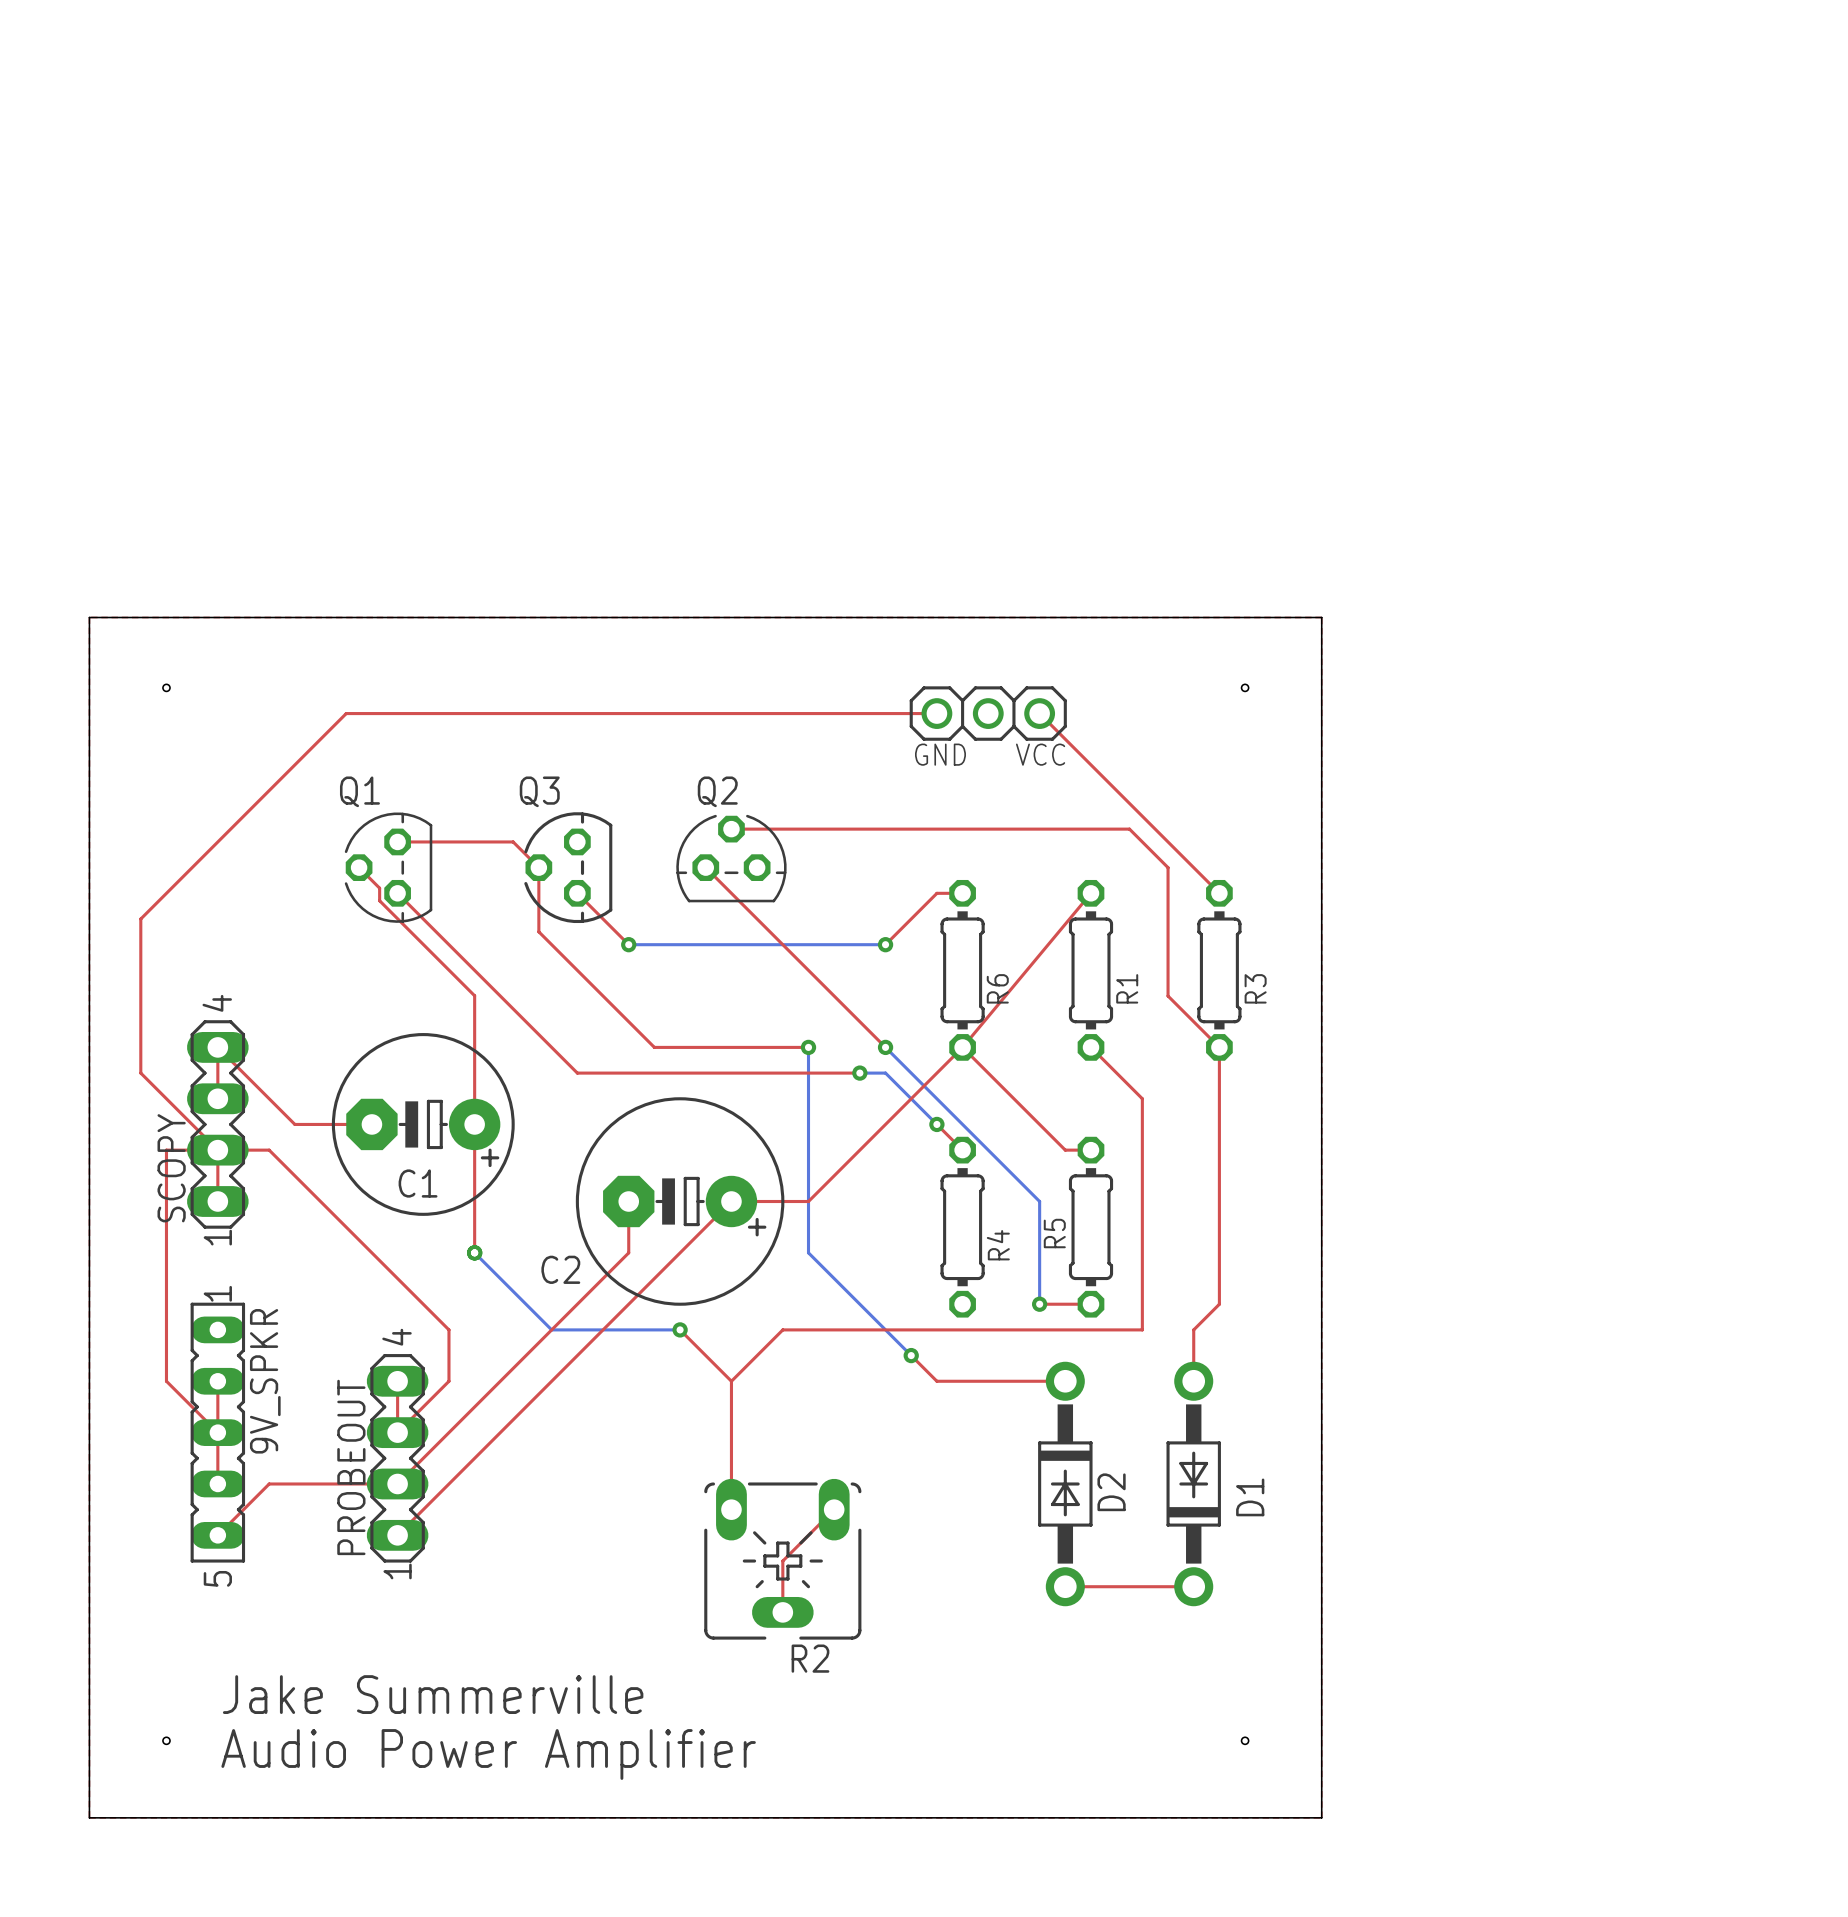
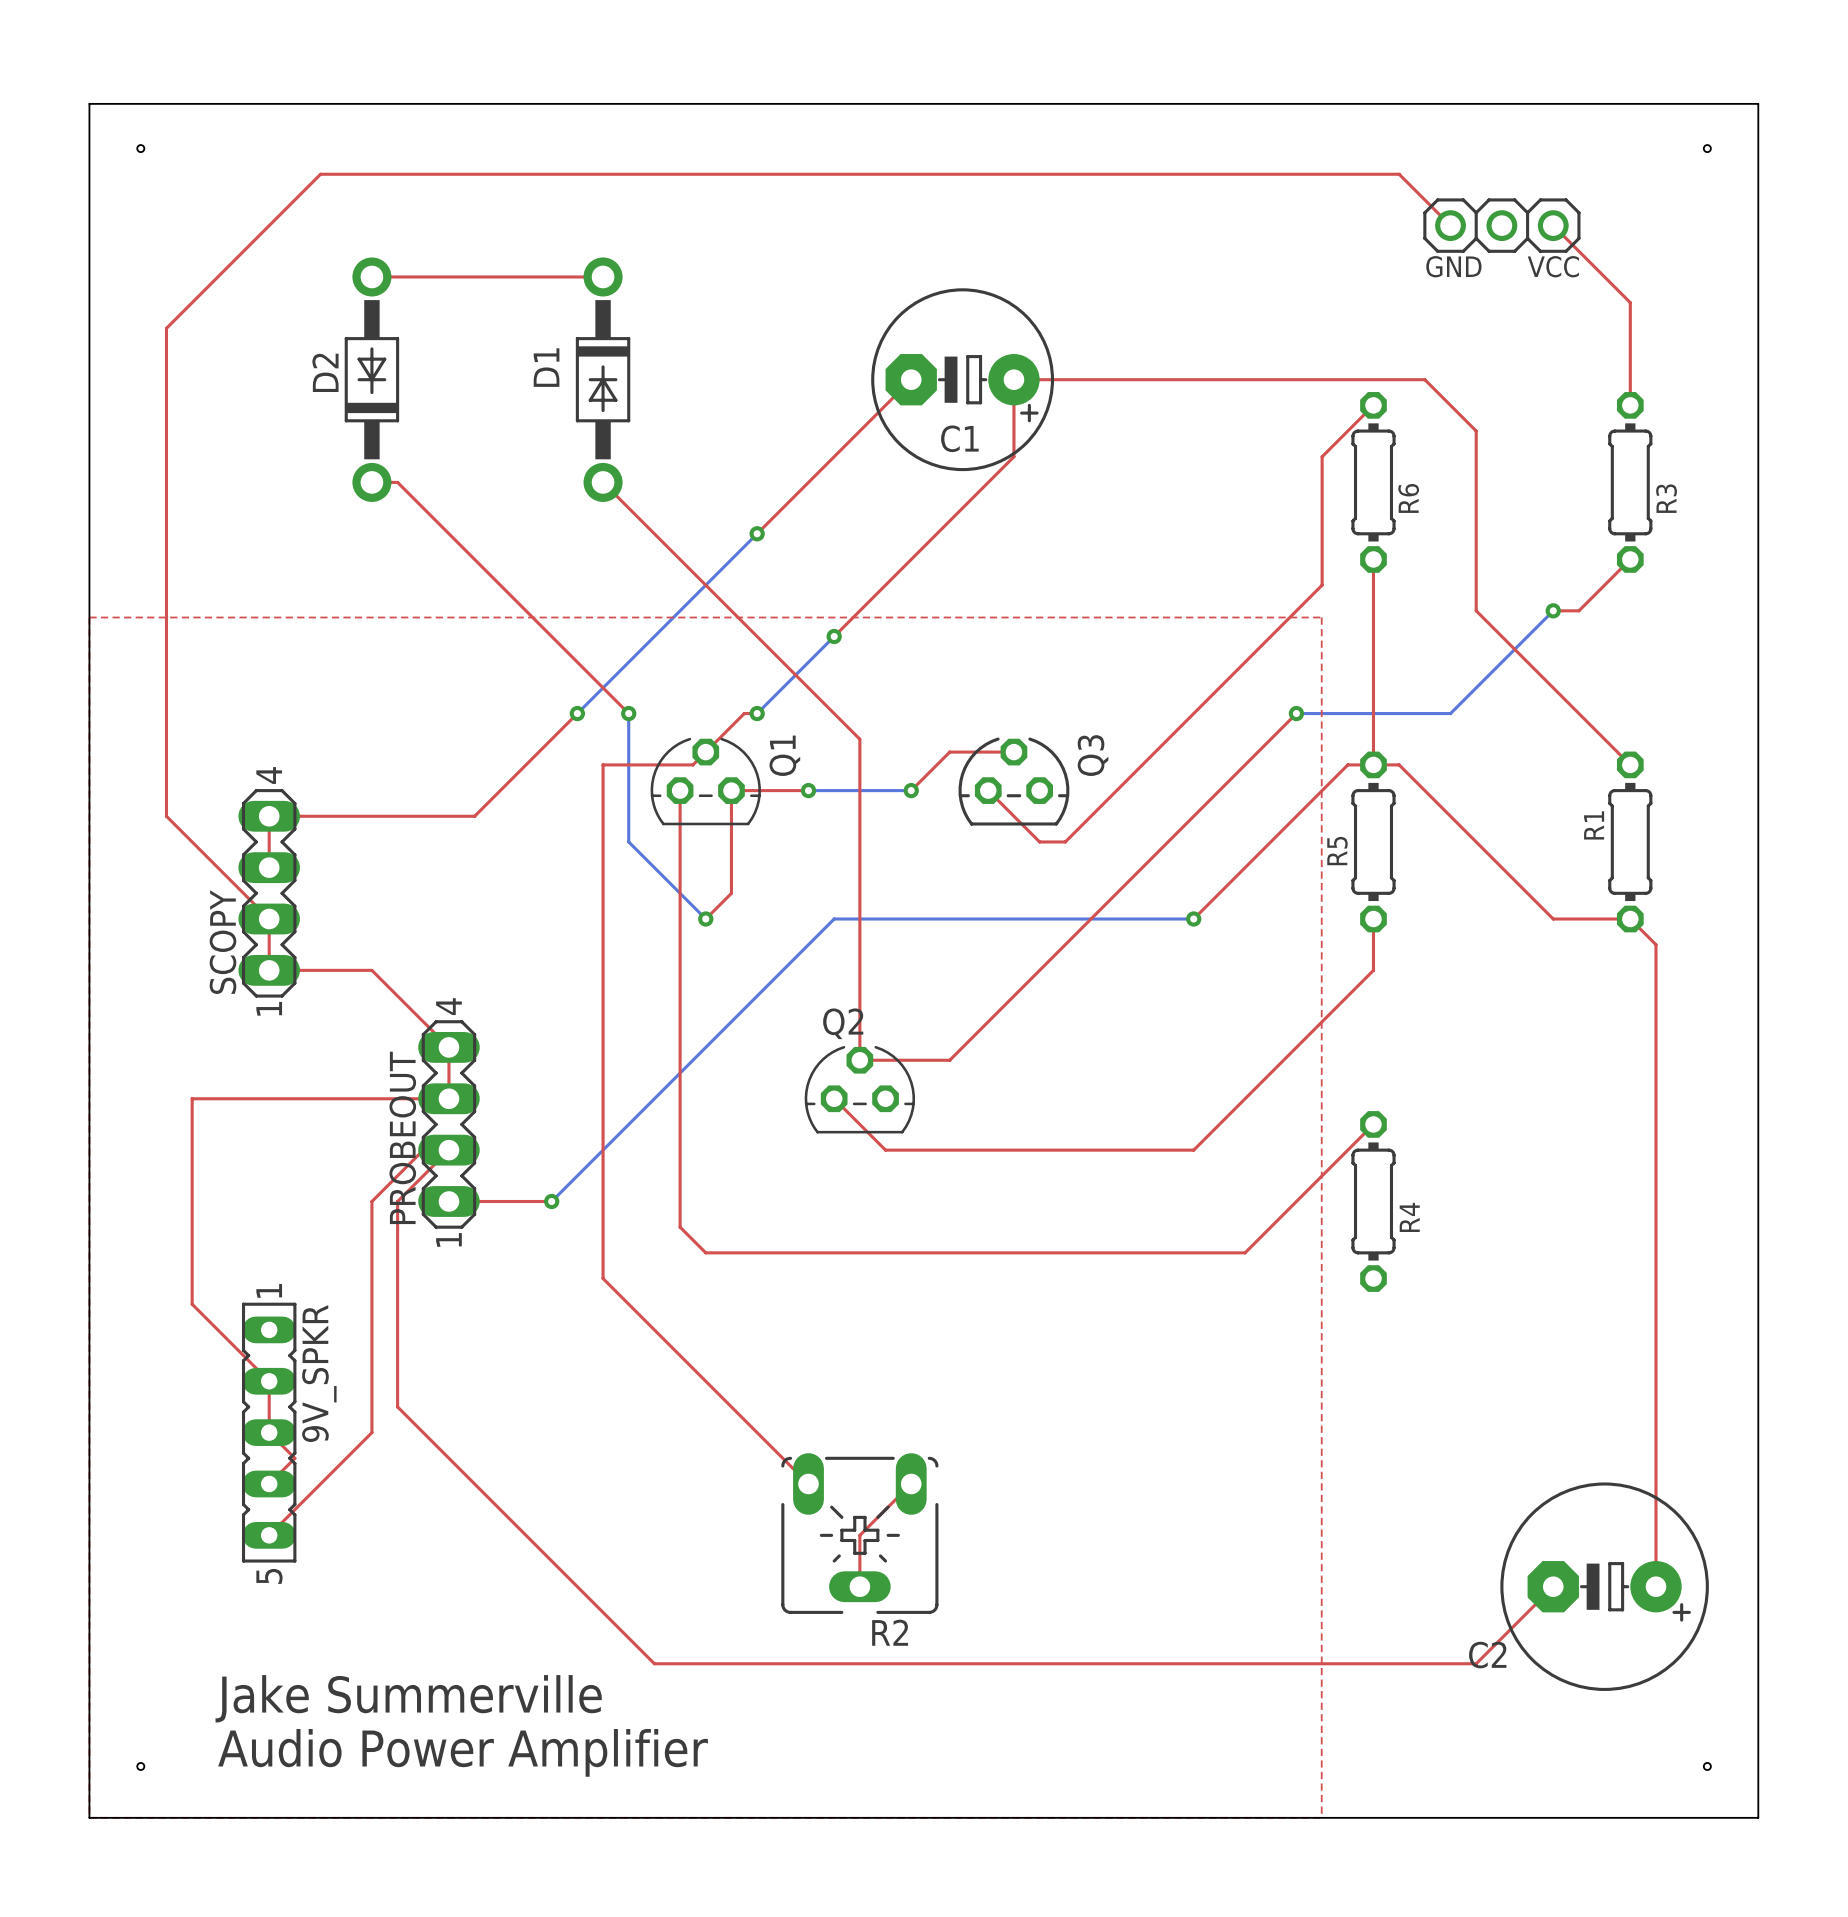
hole: none -> (140, 148)
hole: none -> (1707, 148)
top track: none -> (1450, 225) (1399, 174) (320, 174) (166, 328) (166, 816) (269, 919) (269, 970) (371, 970) (448, 1047) (448, 1098) (192, 1098) (192, 1304) (269, 1381) (269, 1432) (294, 1458) (269, 1483)
part: none -> (1501, 225)
top track: none -> (1553, 225) (1630, 302) (1630, 405)
text: none -> GND (1453, 266)
text: none -> VCC (1553, 266)
top track: none -> (371, 276) (603, 276)
top track: none -> (911, 379) (757, 533)
top track: none -> (1373, 405) (1322, 456) (1322, 585) (1065, 841) (1039, 841) (988, 790)
top track: none -> (371, 482) (397, 482) (628, 713)
bottom track: none -> (757, 533) (577, 713)
via: none -> (757, 533)
top track: none -> (1373, 559) (1373, 764)
top track: none -> (1630, 559) (1578, 610) (1553, 610)
bottom track: none -> (1553, 610) (1450, 713) (1296, 713)
via: none -> (1553, 610)
board edge: (89, 617) (1321, 617) (1321, 1817) -> (89, 617) (89, 103) (1758, 103) (1758, 1817) (1321, 1817)
top track: none -> (834, 636) (1013, 456) (1013, 379) (1424, 379) (1476, 431) (1476, 610) (1630, 764)
bottom track: none -> (834, 636) (757, 713)
via: none -> (834, 636)
hole: (166, 687) -> none
hole: (1245, 687) -> none
top track: none -> (577, 713) (474, 816) (269, 816) (269, 867)
via: none -> (577, 713)
bottom track: none -> (628, 713) (628, 841) (705, 919)
via: none -> (628, 713)
top track: (744, 713) (346, 713) (140, 919) (140, 1073) (217, 1150) (217, 1201) -> (744, 713) (692, 764) (603, 764) (603, 1278) (808, 1483)
top track: (757, 713) (936, 713) -> none
via: none -> (757, 713)
part: (988, 713) -> none
top track: (1039, 713) (1219, 893) -> none
top track: none -> (1296, 713) (962, 1047)
via: none -> (1296, 713)
top track: none -> (1013, 752) (949, 752) (911, 790)
text: GND (940, 754) -> none
text: VCC (1040, 754) -> none
top track: none -> (680, 790) (680, 1227) (705, 1252) (1245, 1252) (1373, 1124)
top track: none -> (808, 790) (731, 790) (731, 893) (705, 919)
bottom track: none -> (808, 790) (911, 790)
via: none -> (808, 790)
via: none -> (911, 790)
top track: (731, 829) (1129, 829) (1168, 867) (1168, 996) (1219, 1047) (1219, 1304) (1193, 1329) (1193, 1381) -> none
top track: (397, 841) (513, 841) (538, 867) (538, 931) (654, 1047) (808, 1047) -> none
Q2 position: (731, 858) -> (859, 1089)
top track: (359, 867) (379, 888) (379, 900) (474, 995) (474, 1252) -> none
Q1 rotation: 0° (388, 867) -> 90° clockwise (705, 781)
Q1 position: (388, 867) -> (705, 781)
Q3 rotation: 0° (568, 867) -> 90° clockwise (1013, 781)
Q3 position: (568, 867) -> (1013, 781)
top track: (705, 867) (885, 1047) -> none
top track: (397, 893) (577, 1073) (859, 1073) -> none
top track: (577, 893) (628, 944) -> none
top track: (962, 893) (936, 893) (885, 944) -> none
top track: (1091, 893) (962, 1047) (1065, 1150) -> (834, 1098) (885, 1150) (1065, 1150)
top track: none -> (1193, 919) (1347, 764) (1399, 764) (1553, 919) (1630, 919) (1655, 944) (1655, 1586)
bottom track: none -> (1193, 919) (834, 919) (551, 1201)
via: none -> (1193, 919)
top track: none -> (1373, 919) (1373, 970) (1193, 1150) (1091, 1150)
bottom track: (628, 944) (885, 944) -> none
via position: (628, 944) -> (705, 919)
via: (885, 944) -> none
R6 position: (962, 970) -> (1373, 482)
R1 position: (1091, 970) -> (1630, 841)
R3 position: (1219, 970) -> (1630, 482)
R1 name position: R1 (1127, 988) -> R1 (1594, 825)
bottom track: (808, 1047) (808, 1252) (911, 1355) -> none
via: (808, 1047) -> none
bottom track: (885, 1047) (1039, 1201) (1039, 1304) -> none
via: (885, 1047) -> none
top track: (1091, 1047) (1142, 1098) (1142, 1329) (782, 1329) (731, 1381) -> none
top track: (949, 1060) (808, 1201) (731, 1201) (397, 1535) -> (949, 1060) (859, 1060) (859, 739) (603, 482)
bottom track: (859, 1073) (885, 1073) (936, 1124) -> none
via: (859, 1073) -> none
top track: (217, 1098) (217, 1047) (294, 1124) (371, 1124) -> none
SCOPY position: (217, 1124) -> (269, 893)
C1 position: (423, 1124) -> (962, 379)
top track: (936, 1124) (962, 1150) -> none
via: (936, 1124) -> none
top track: none -> (448, 1201) (551, 1201)
via: none -> (551, 1201)
top track: (628, 1201) (628, 1252) (397, 1483) (269, 1483) (217, 1535) -> none
C2 position: (680, 1201) -> (1604, 1586)
R4 position: (962, 1227) -> (1373, 1201)
R5 position: (1091, 1227) -> (1373, 841)
bottom track: (474, 1252) (551, 1329) (680, 1329) -> none
via: (474, 1252) -> none
top track: (1039, 1304) (1091, 1304) -> none
via: (1039, 1304) -> none
top track: (680, 1329) (731, 1381) -> none
via: (680, 1329) -> none
top track: (911, 1355) (936, 1381) (1065, 1381) -> none
via: (911, 1355) -> none
top track: (217, 1381) (217, 1483) -> none
top track: none -> (397, 1381) (397, 1201) (448, 1150) (423, 1150) (371, 1201) (371, 1432) (269, 1535)
top track: (731, 1381) (731, 1509) -> none
top track: (397, 1406) (397, 1432) (448, 1381) (448, 1329) (269, 1150) (166, 1150) (166, 1381) (217, 1432) -> (397, 1406) (654, 1663) (1476, 1663) (1553, 1586)
9V_SPKR position: (217, 1432) -> (269, 1432)
PROBEOUT position: (397, 1458) -> (448, 1124)
D2 rotation: 0° (1065, 1483) -> 180° (371, 379)
D2 position: (1065, 1483) -> (371, 379)
D1 rotation: 0° (1193, 1483) -> 180° (603, 379)
D1 position: (1193, 1483) -> (603, 379)
top track: (834, 1509) (782, 1561) (782, 1612) -> (911, 1483) (859, 1535) (859, 1586)
R2 position: (782, 1559) -> (859, 1533)
top track: (1065, 1586) (1193, 1586) -> none
hole position: (166, 1740) -> (140, 1766)
hole position: (1245, 1740) -> (1707, 1766)

